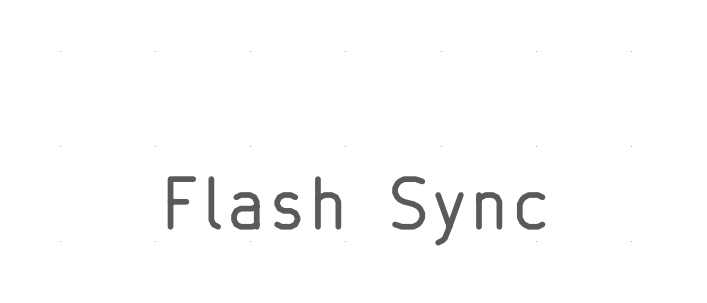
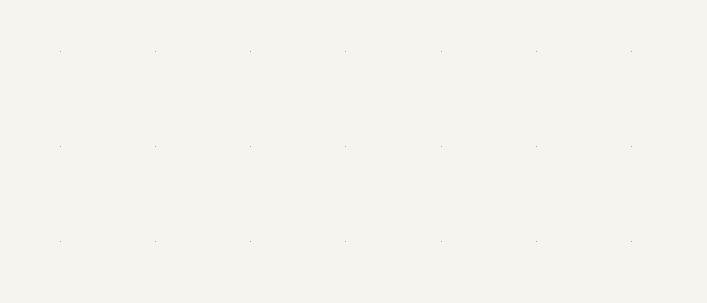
text: Flash Sync (356, 210) -> none

